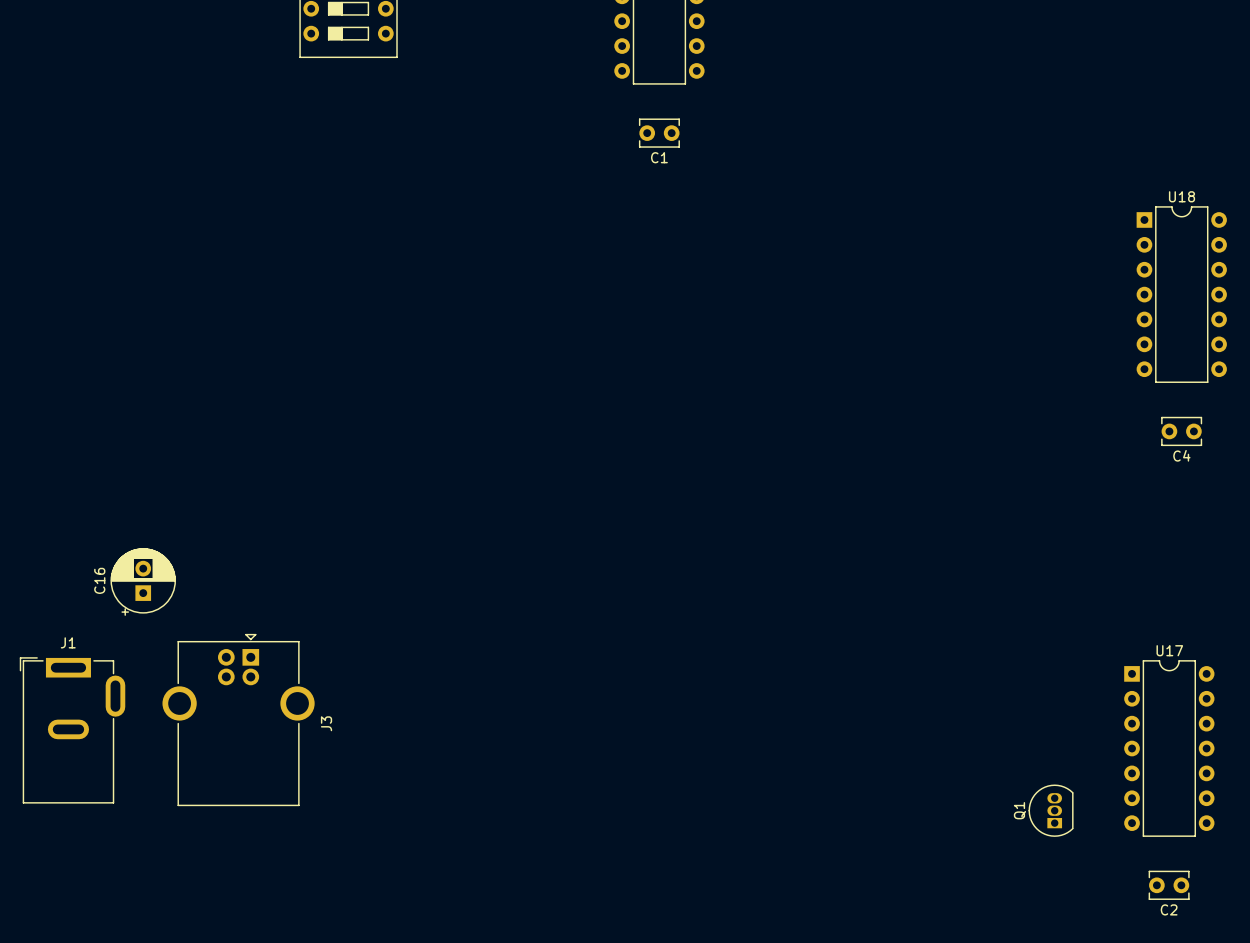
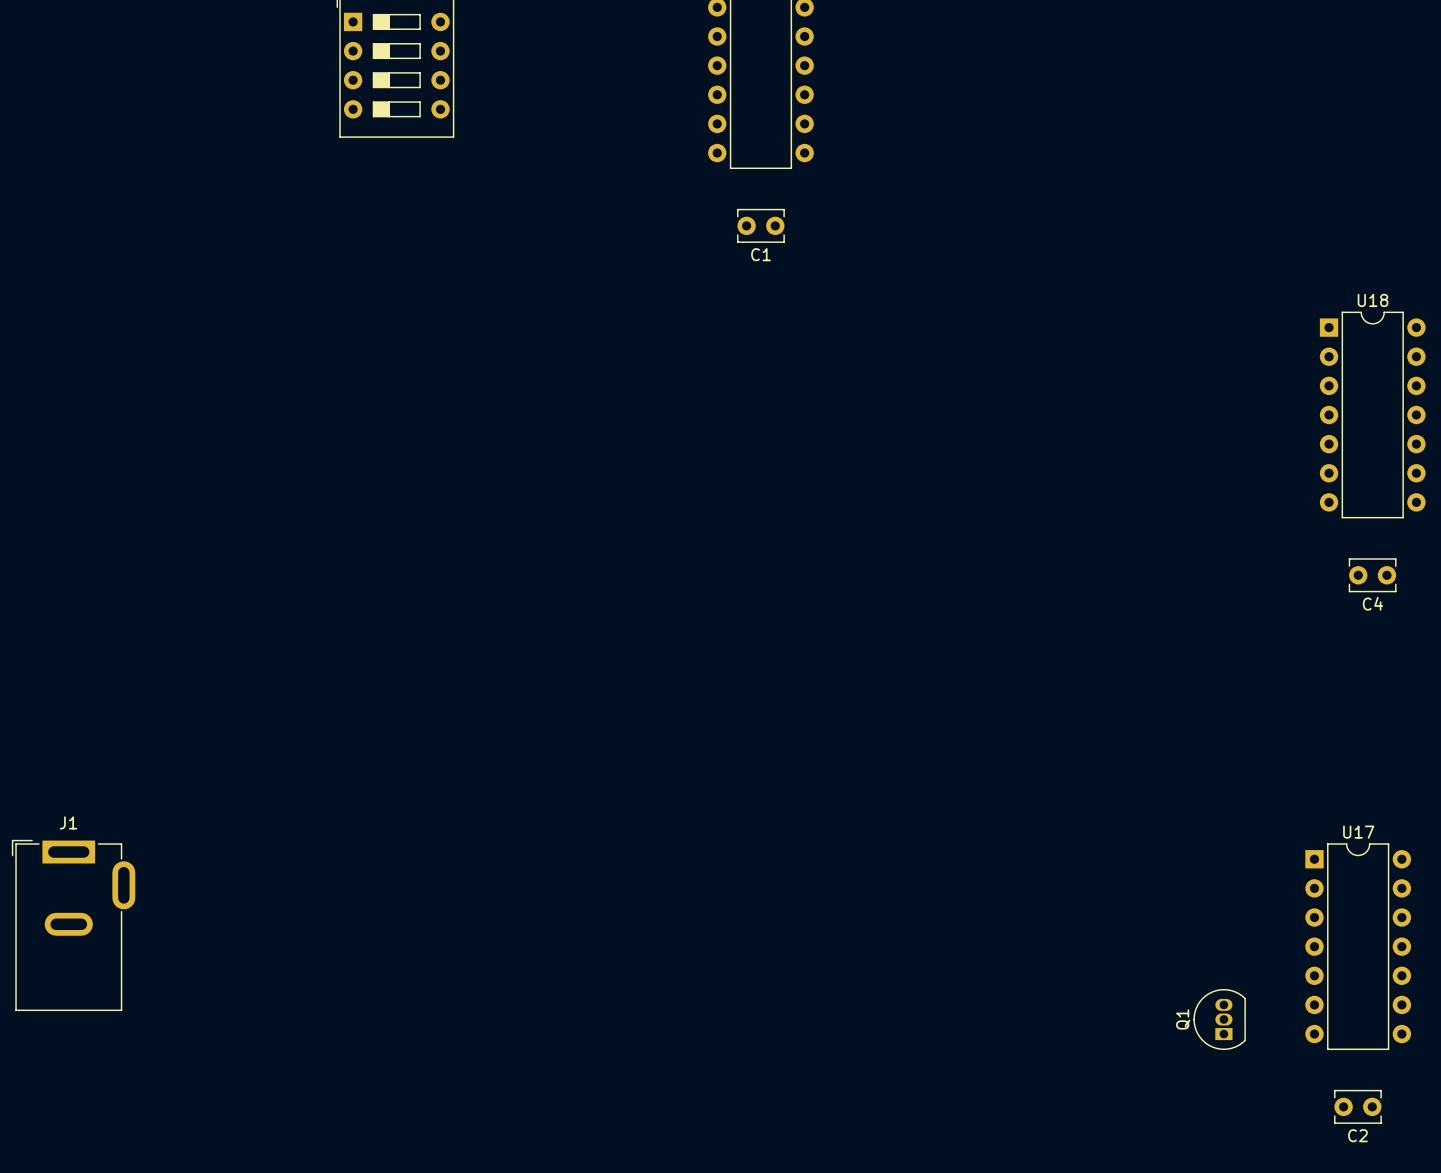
C16: (143, 581) -> none
J3: (238, 720) -> none

